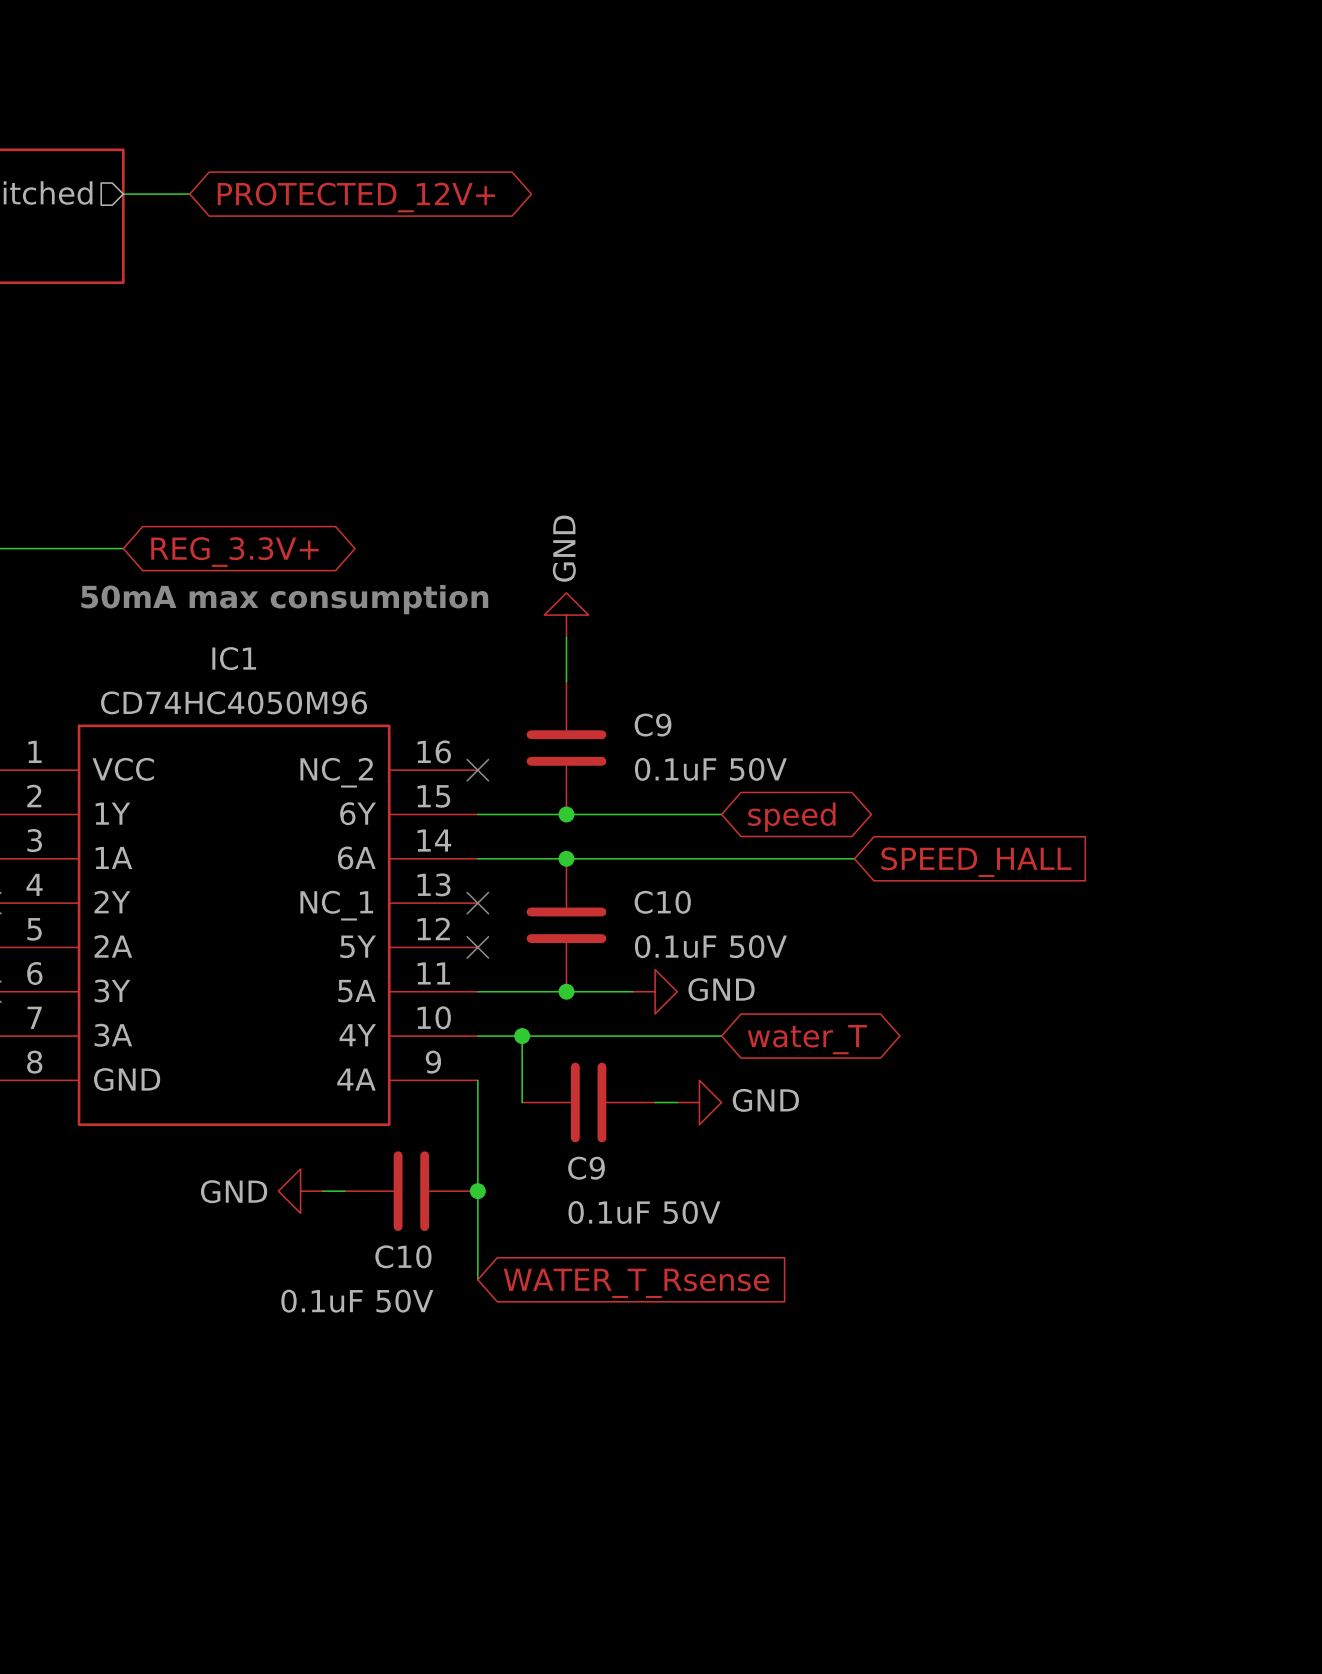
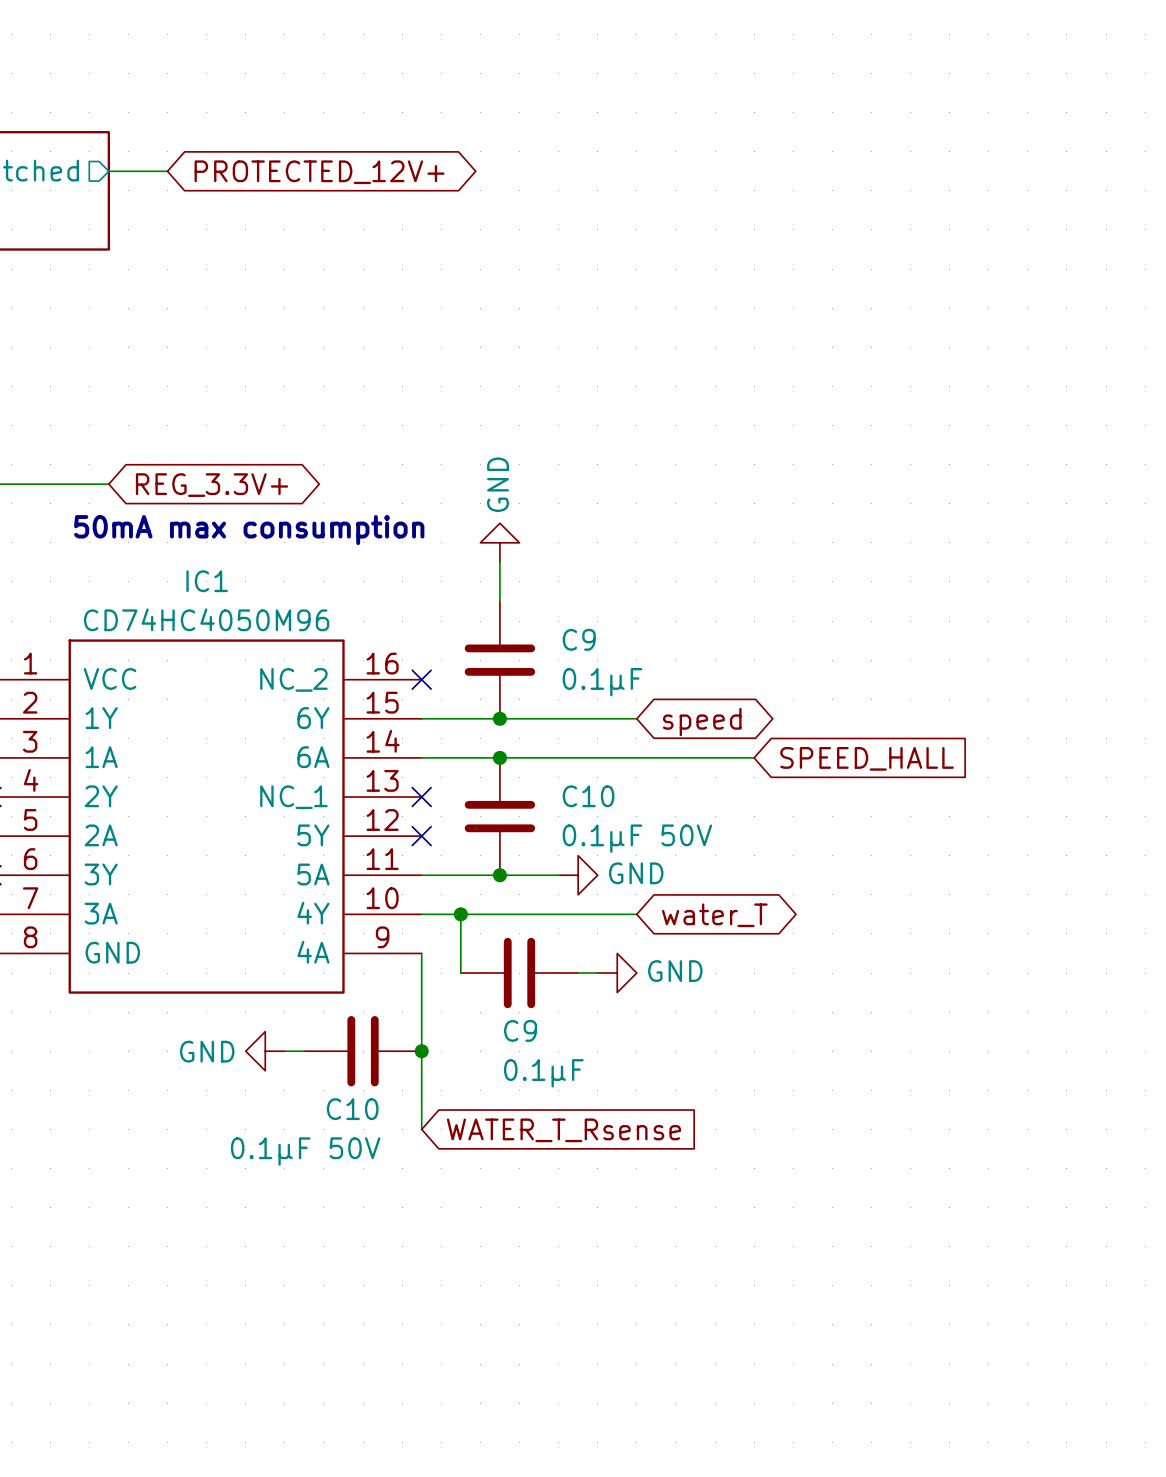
C9 value: 0.1uF 50V (710, 769) -> 0.1µF (602, 682)
C10 value: 0.1uF 50V (710, 946) -> 0.1µF 50V (637, 838)
C9 value: 0.1uF 50V (644, 1212) -> 0.1µF (543, 1073)
C10 value: 0.1uF 50V (357, 1301) -> 0.1µF 50V (305, 1151)

